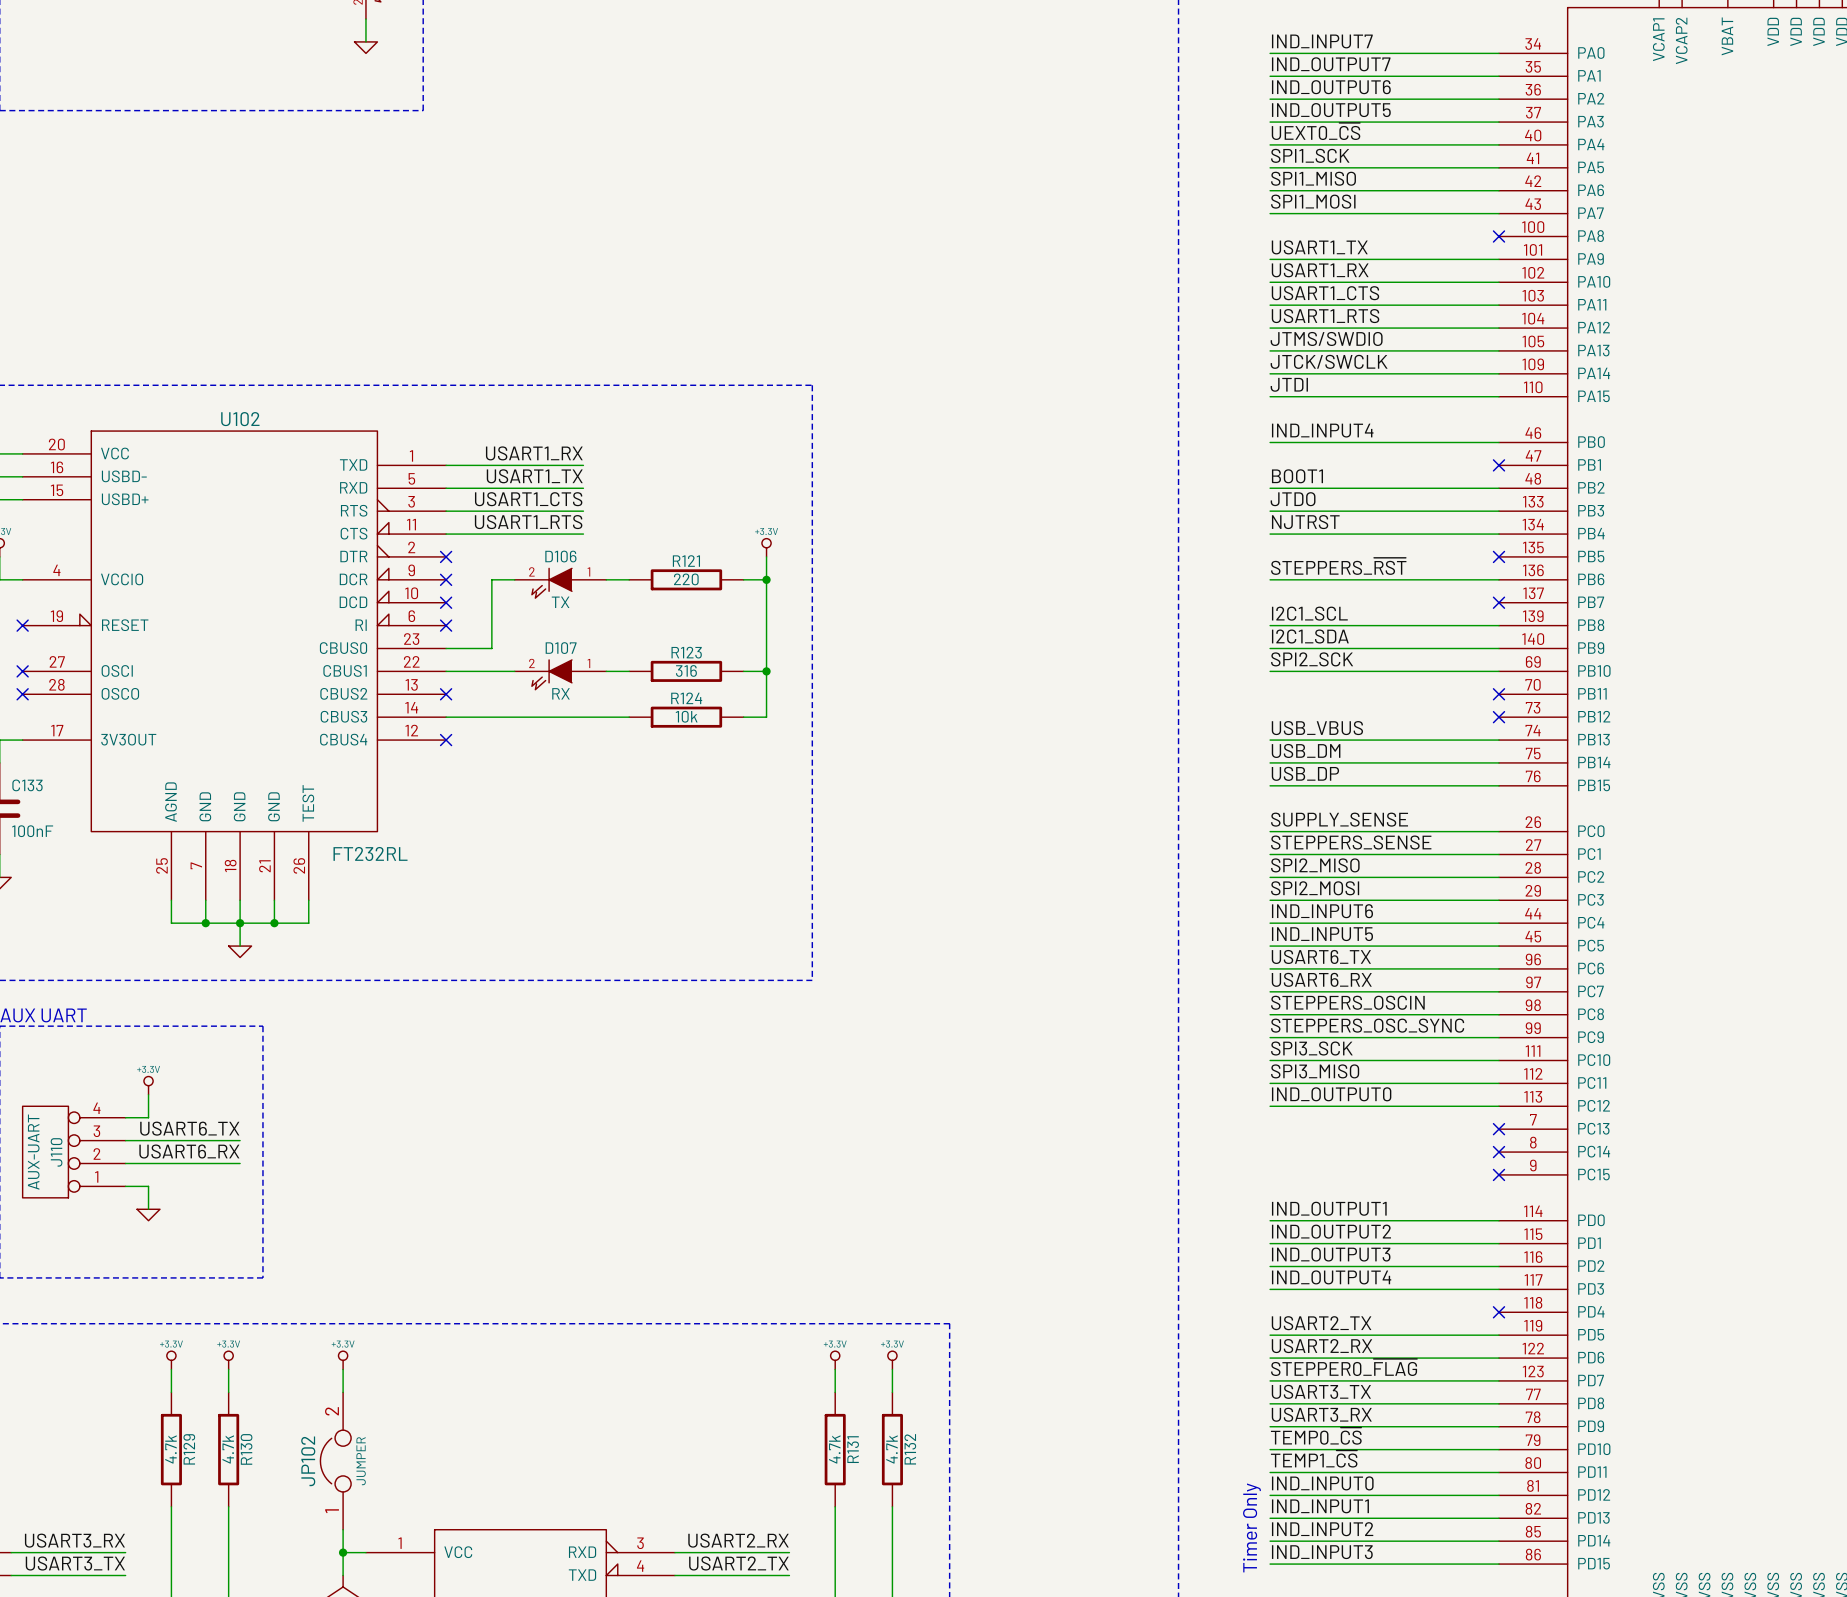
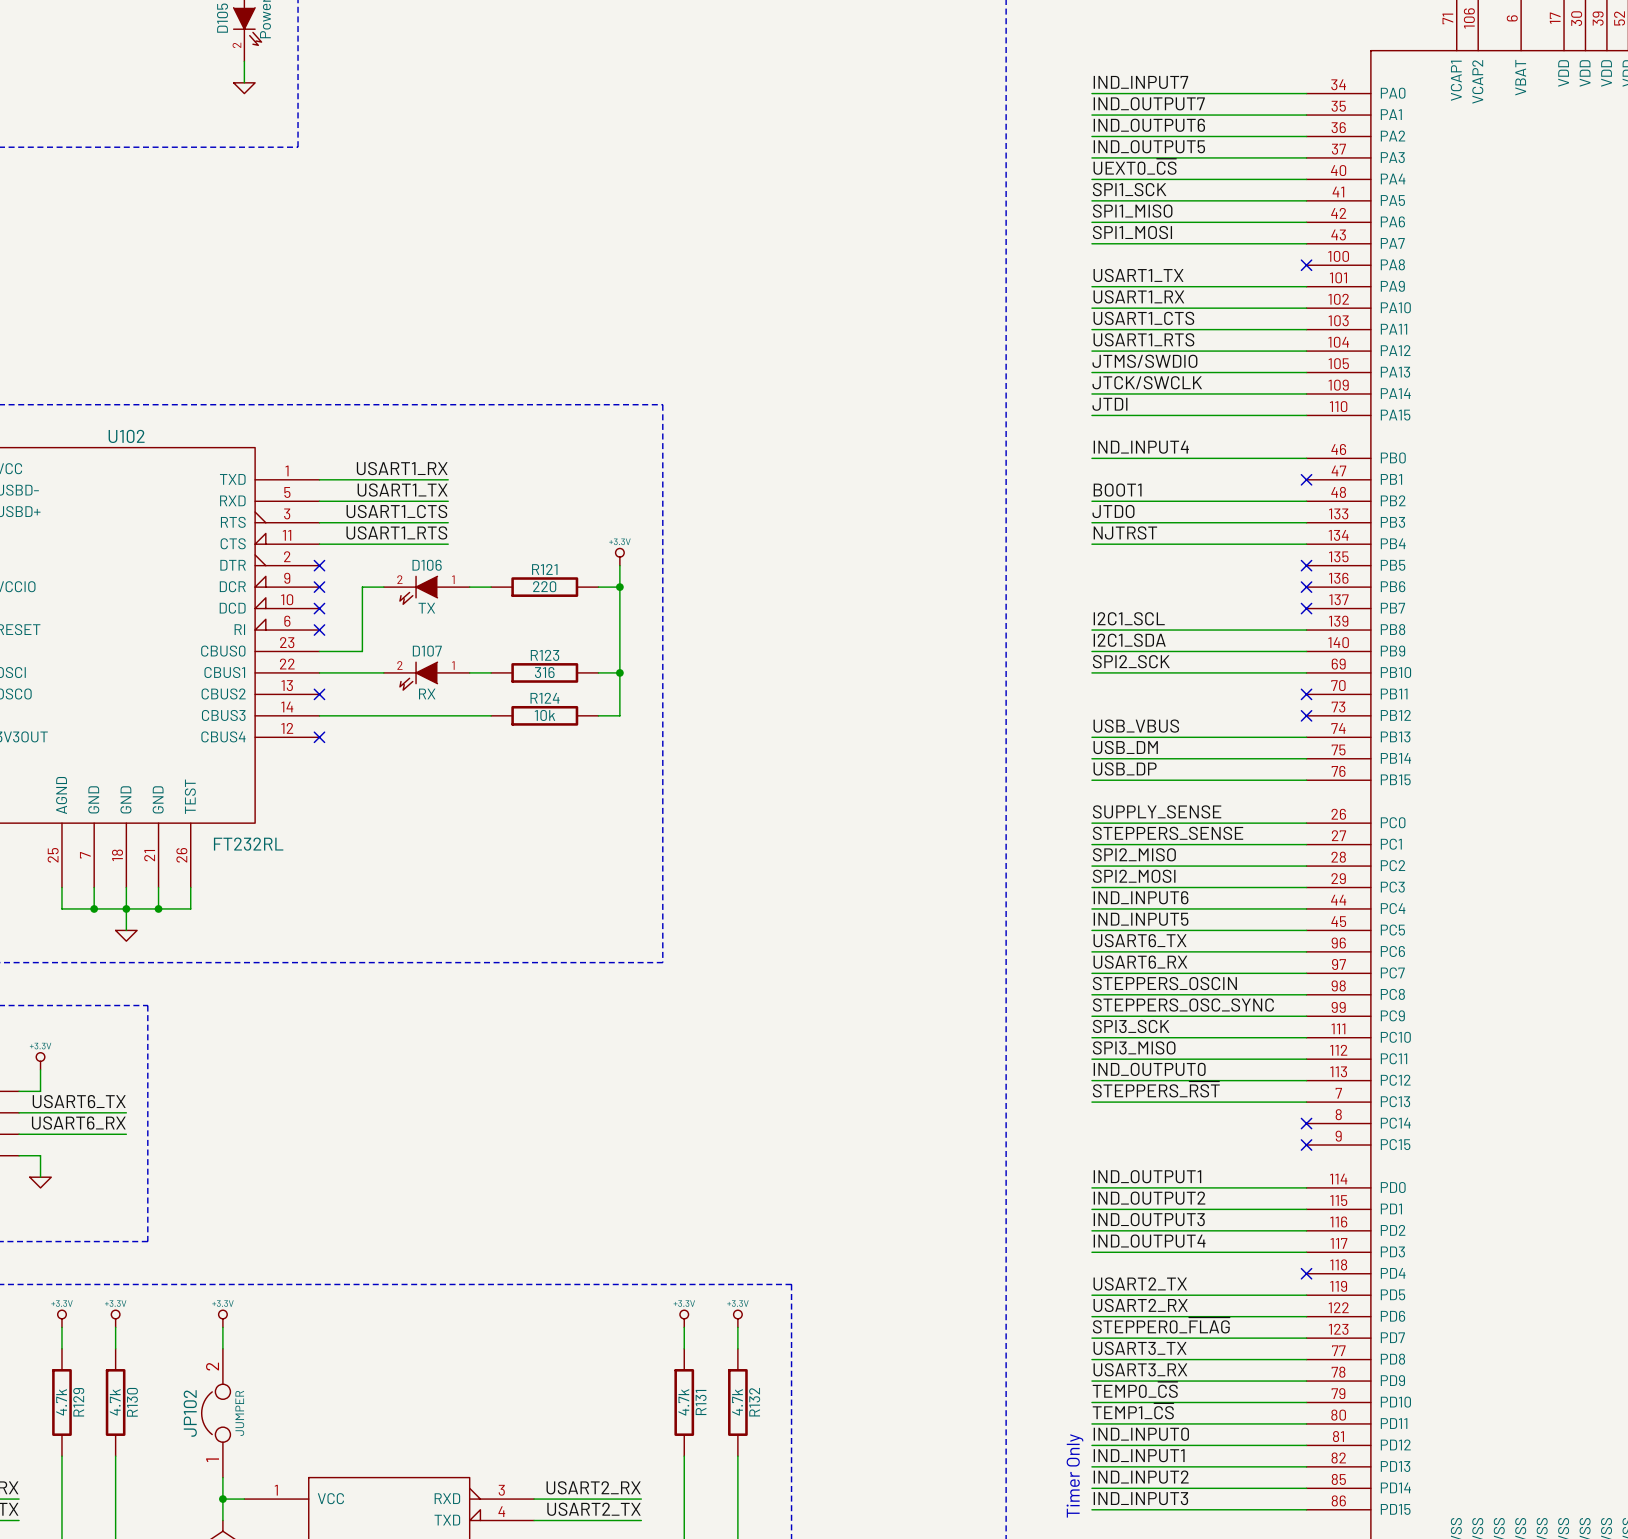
label: STEPPERS_~{RST} (1338, 566) -> none
wire: (1270, 579) (1498, 579) -> none
no-connect mark: none -> (1306, 587)
label: none -> STEPPERS_~{RST} (1156, 1089)
wire: none -> (1091, 1102) (1306, 1102)
no-connect mark: (1498, 1129) -> none

